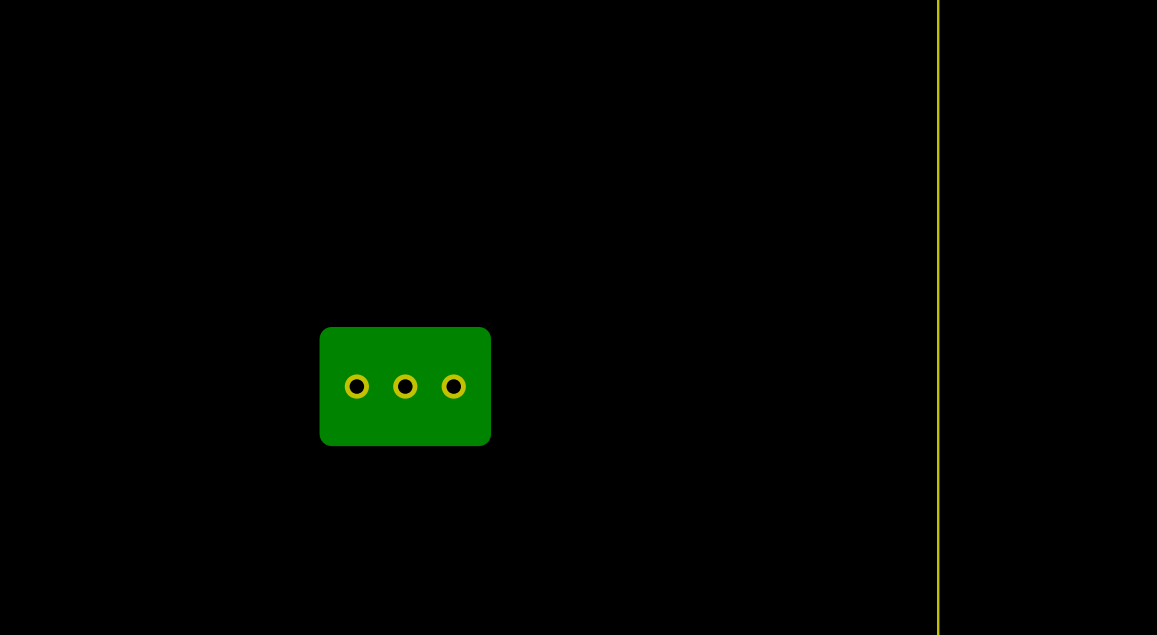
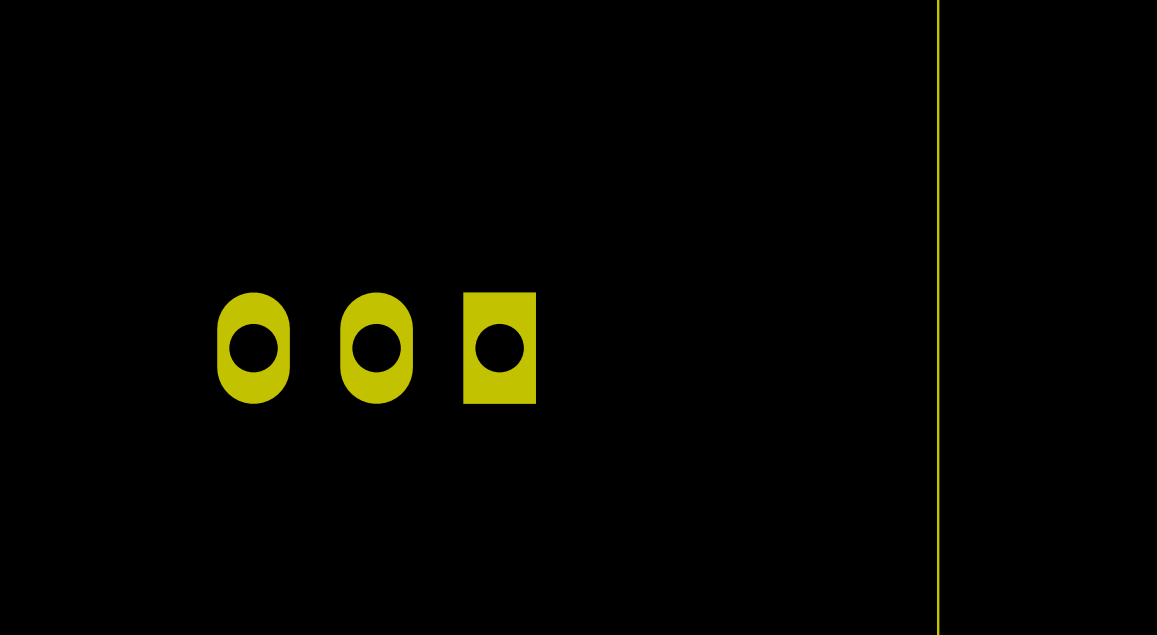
part footprint: [319, 326, 492, 447] -> [217, 292, 536, 404]

